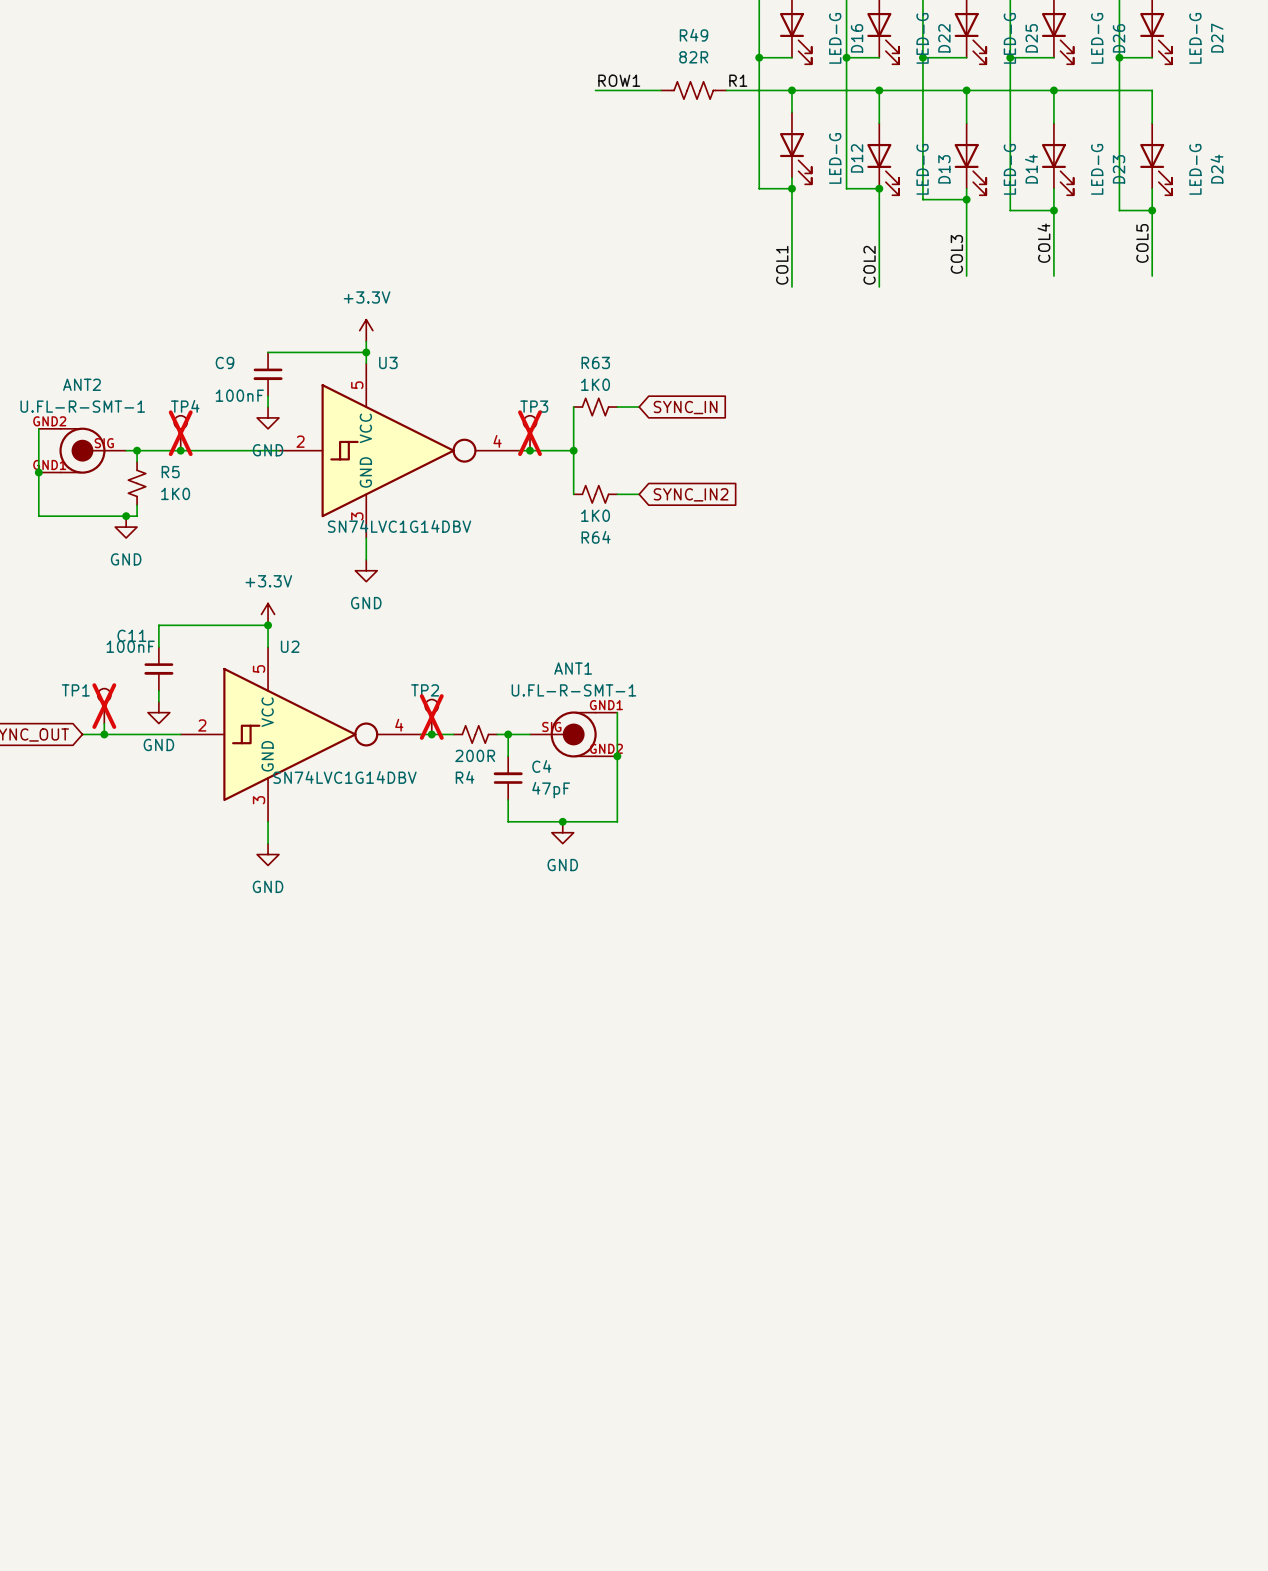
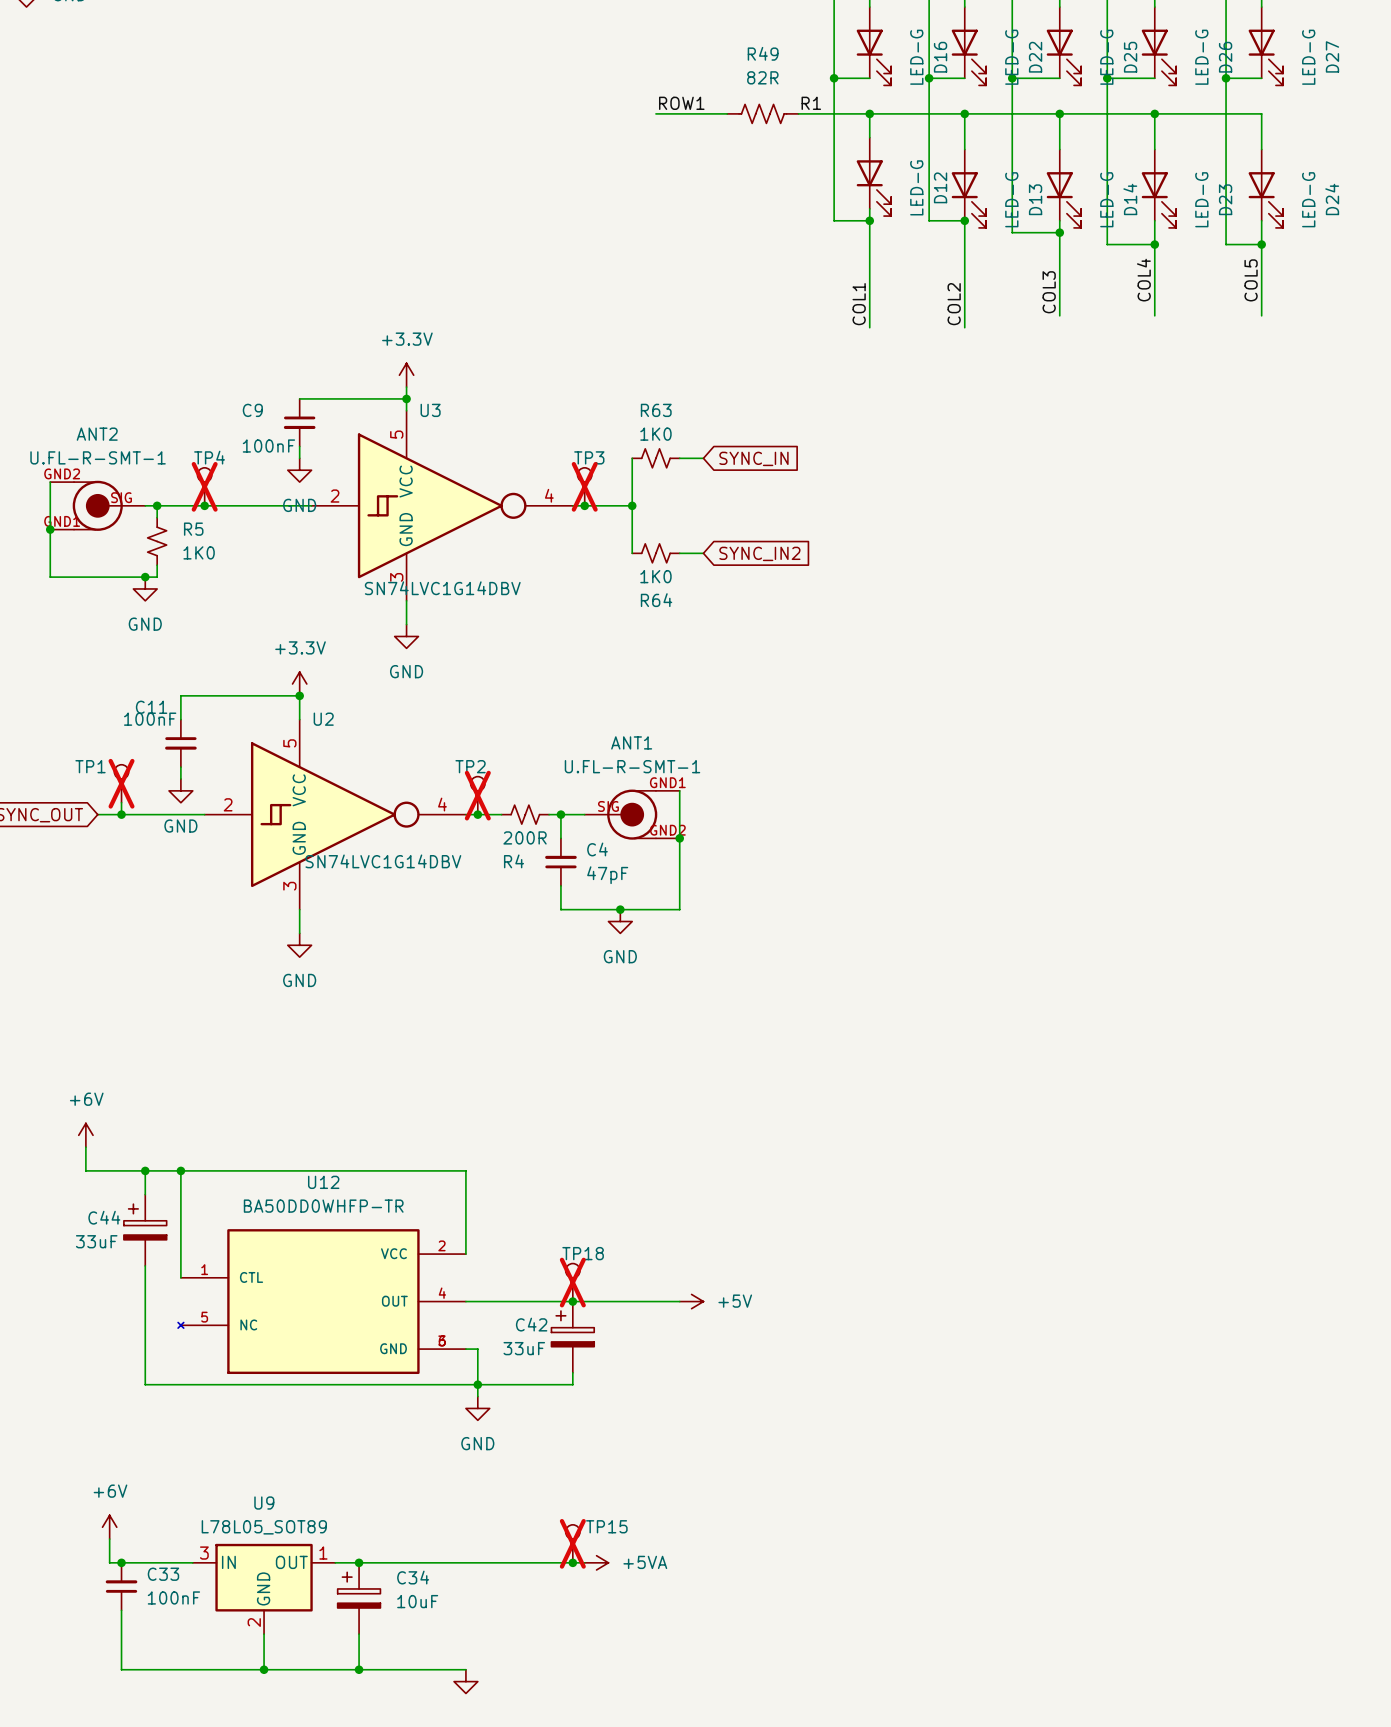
power symbol: none -> +6V (85, 1135)
wire: none -> (85, 1147) (85, 1170) (465, 1170) (465, 1254)
wire: none -> (145, 1170) (145, 1194)
junction: none -> (145, 1170)
wire: none -> (180, 1170) (180, 1277)
junction: none -> (180, 1170)
C44: none -> 33uF (145, 1230)
wire: none -> (145, 1265) (145, 1384) (572, 1384) (572, 1372)
TP18: none -> (572, 1282)
U12: none -> BA50DD0WHFP-TR (322, 1301)
wire: none -> (465, 1301) (679, 1301)
junction: none -> (572, 1301)
power symbol: none -> +5V (691, 1301)
C42: none -> 33uF (572, 1337)
wire: none -> (465, 1349) (477, 1349) (477, 1396)
junction: none -> (477, 1384)
power symbol: none -> GND (477, 1408)
power symbol: none -> +6V (109, 1527)
wire: none -> (109, 1539) (109, 1562) (192, 1562)
TP15: none -> (572, 1543)
junction: none -> (121, 1562)
wire: none -> (335, 1562) (584, 1562)
junction: none -> (359, 1562)
junction: none -> (572, 1562)
power symbol: none -> +5VA (596, 1562)
C33: none -> 100nF (121, 1586)
U9: none -> L78L05_SOT89 (264, 1588)
C34: none -> 10uF (359, 1598)
wire: none -> (121, 1610) (121, 1669) (465, 1669)
wire: none -> (264, 1634) (264, 1669)
wire: none -> (359, 1634) (359, 1669)
junction: none -> (264, 1669)
junction: none -> (359, 1669)
power symbol: none -> (465, 1681)

